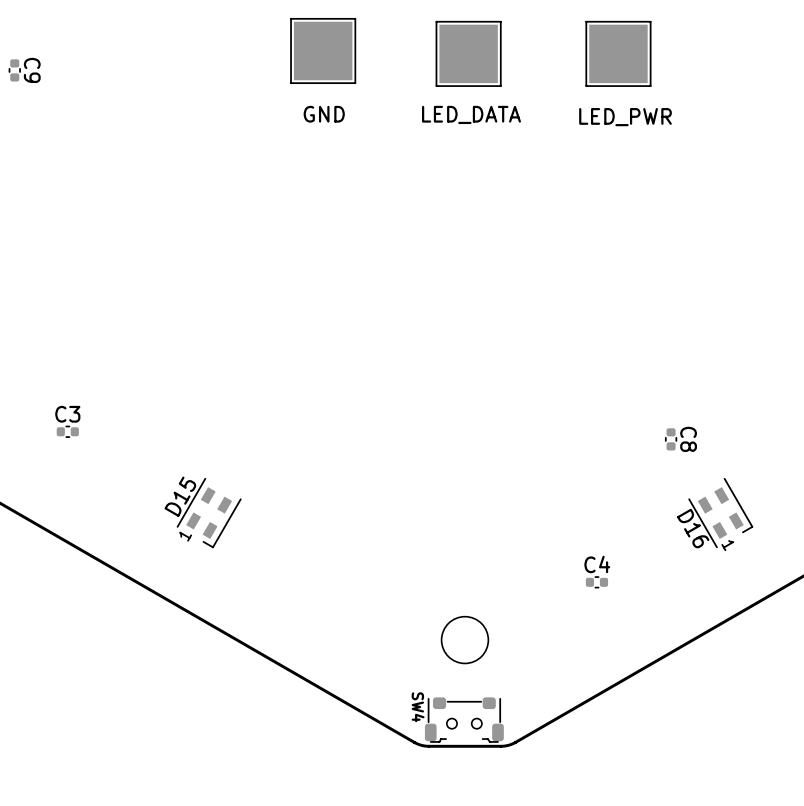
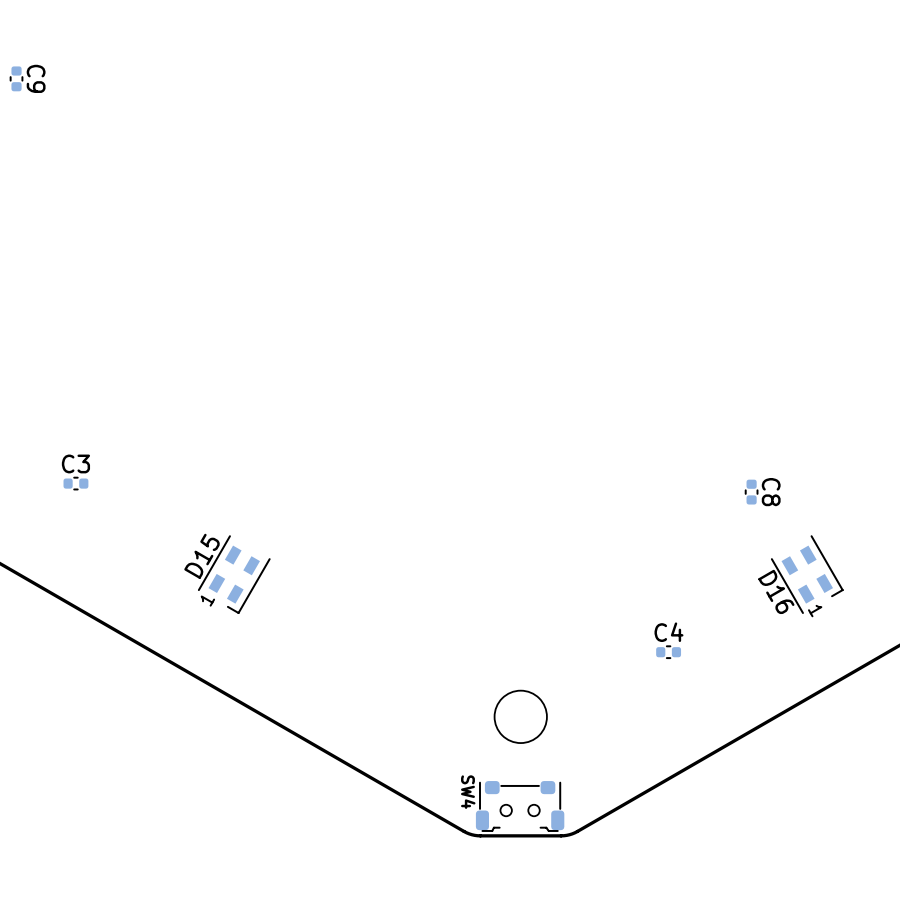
part: (323, 50) -> none
part: (468, 53) -> none
part: (618, 53) -> none
text: GND (324, 114) -> none
text: LED_DATA (471, 114) -> none
text: LED_PWR (625, 117) -> none

